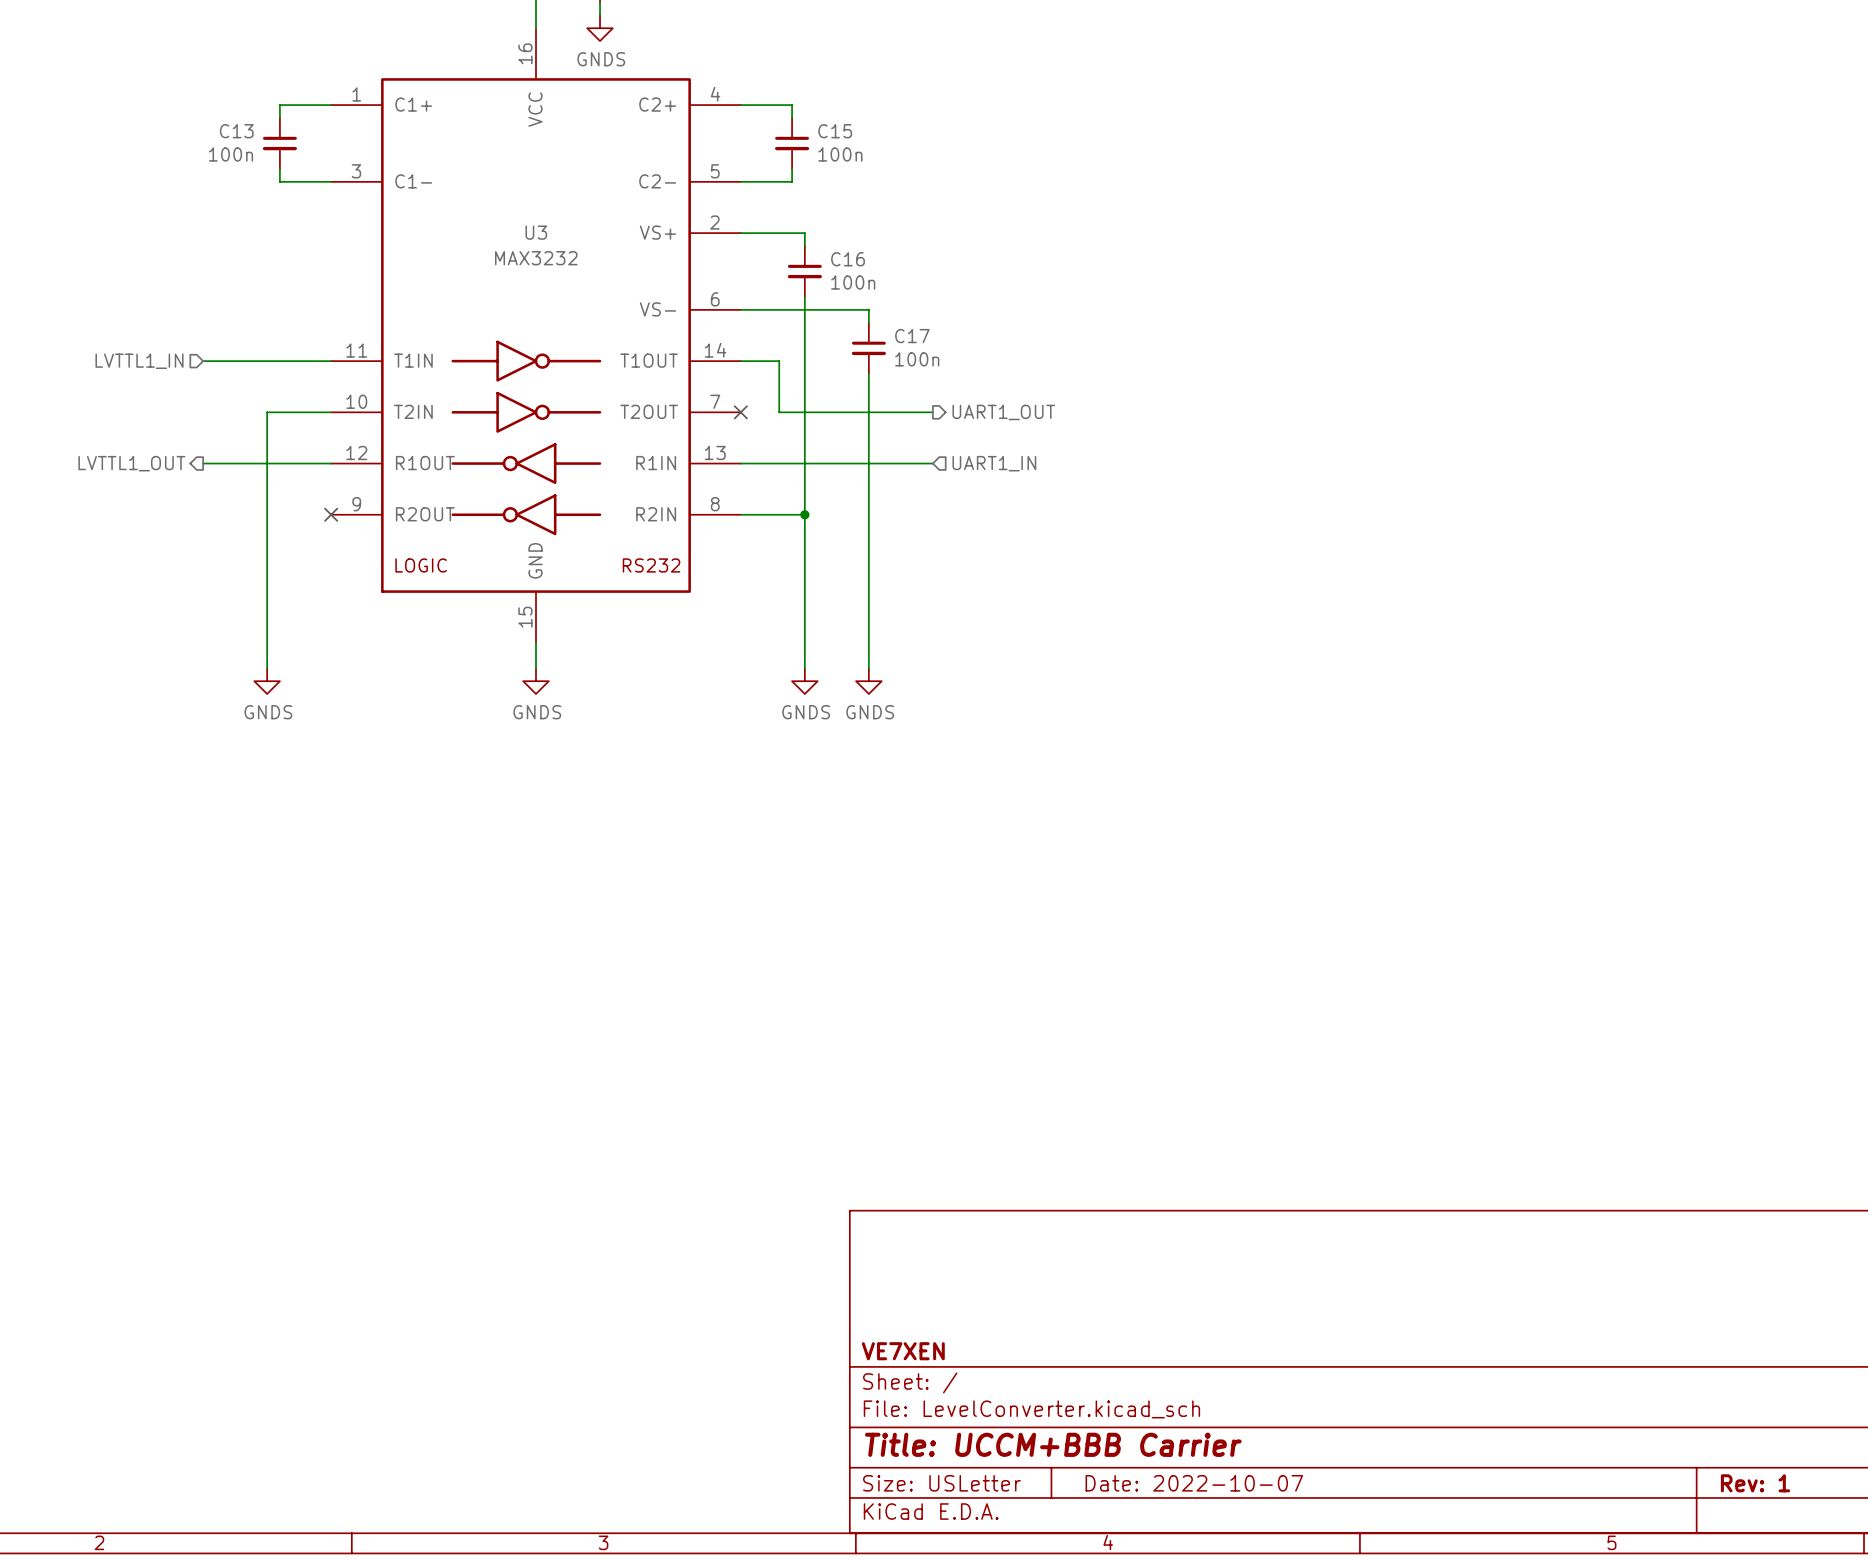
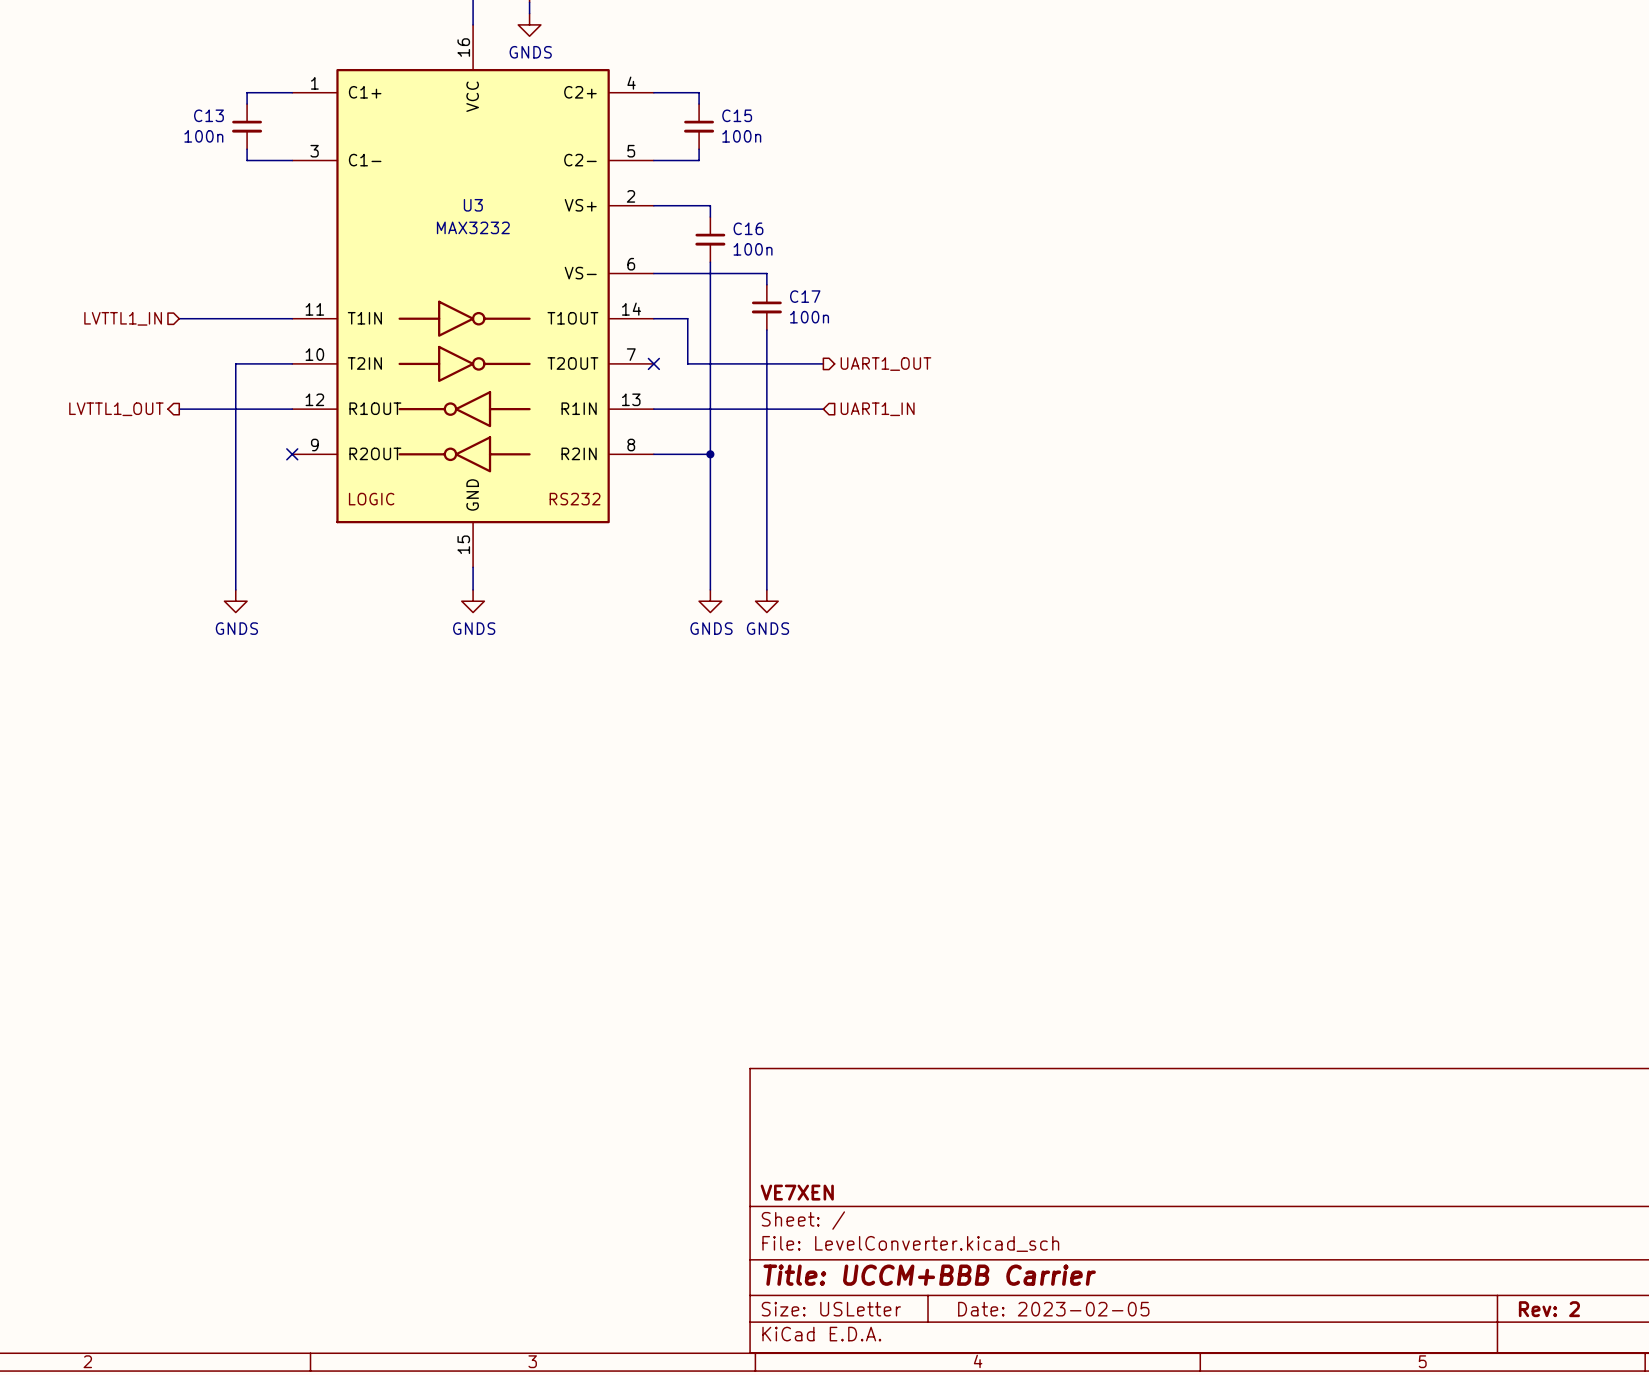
title block: Date: 2022-10-07 (1194, 1483) -> Date: 2023-02-05 (1053, 1309)
title block: Rev: 1 (1755, 1483) -> Rev: 2 (1549, 1309)

